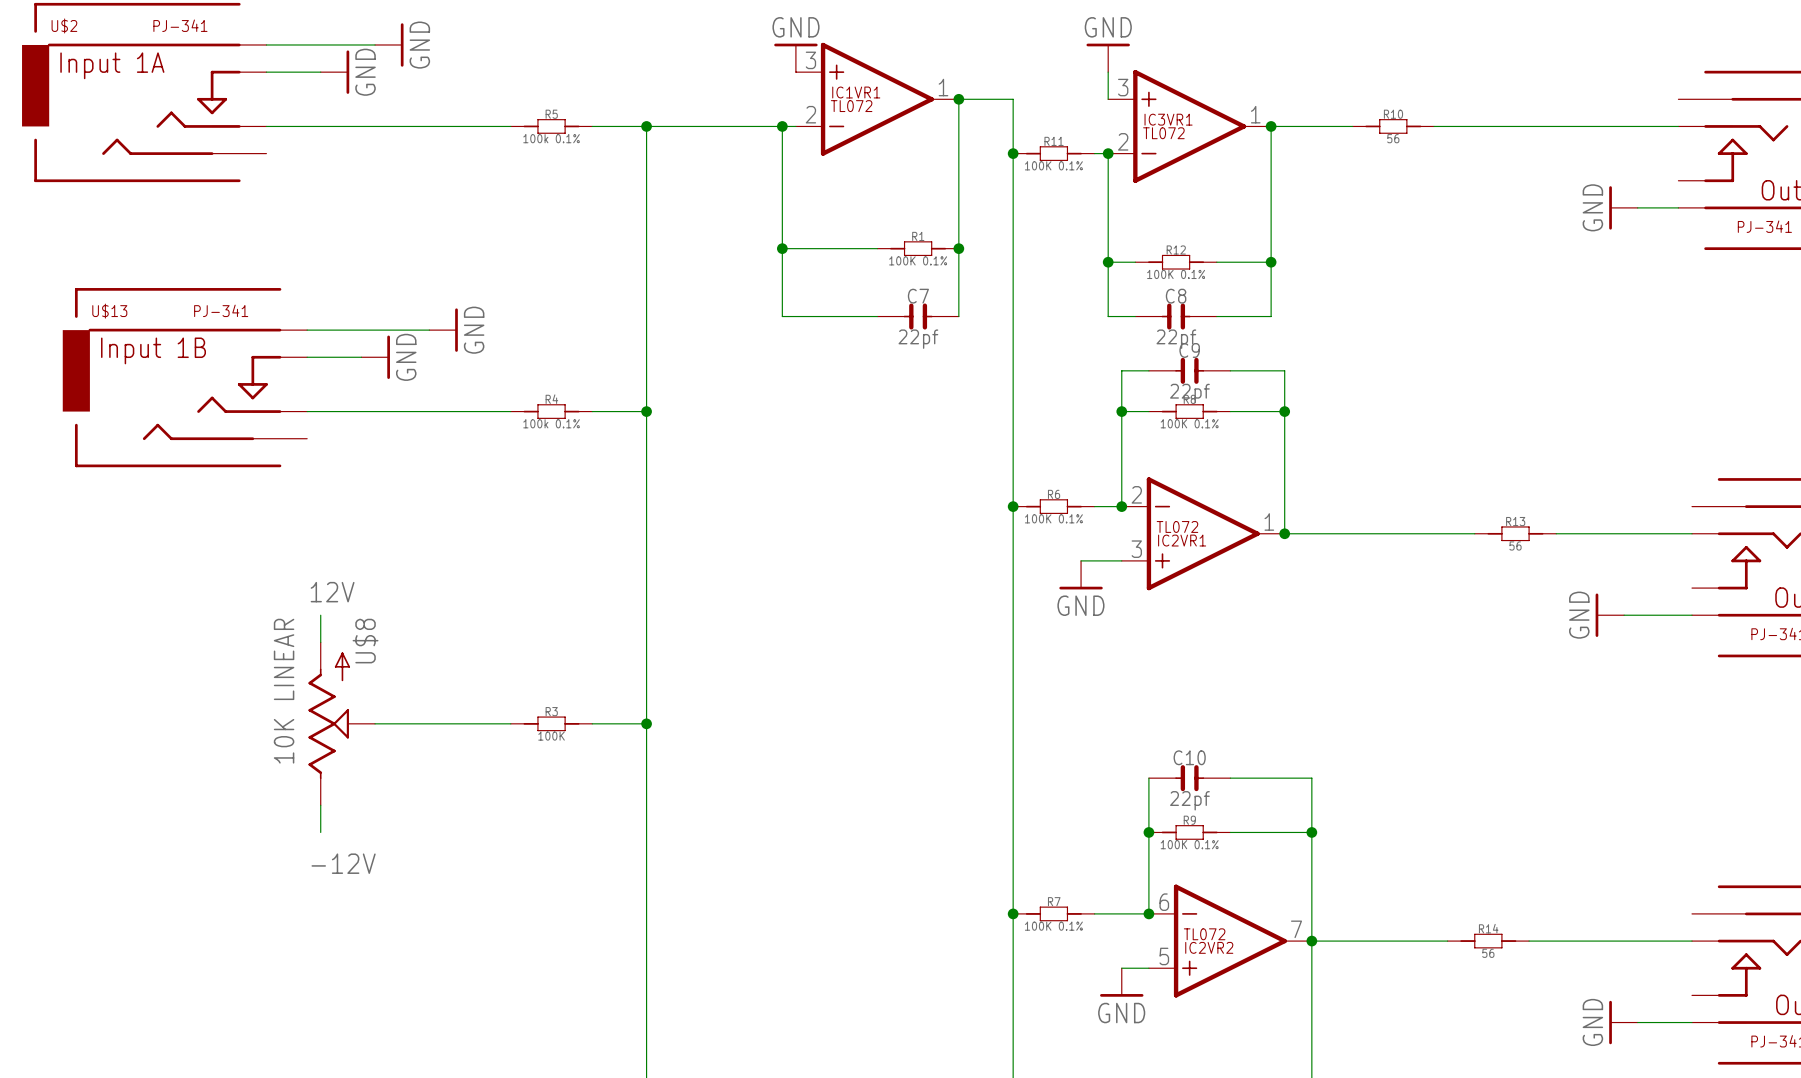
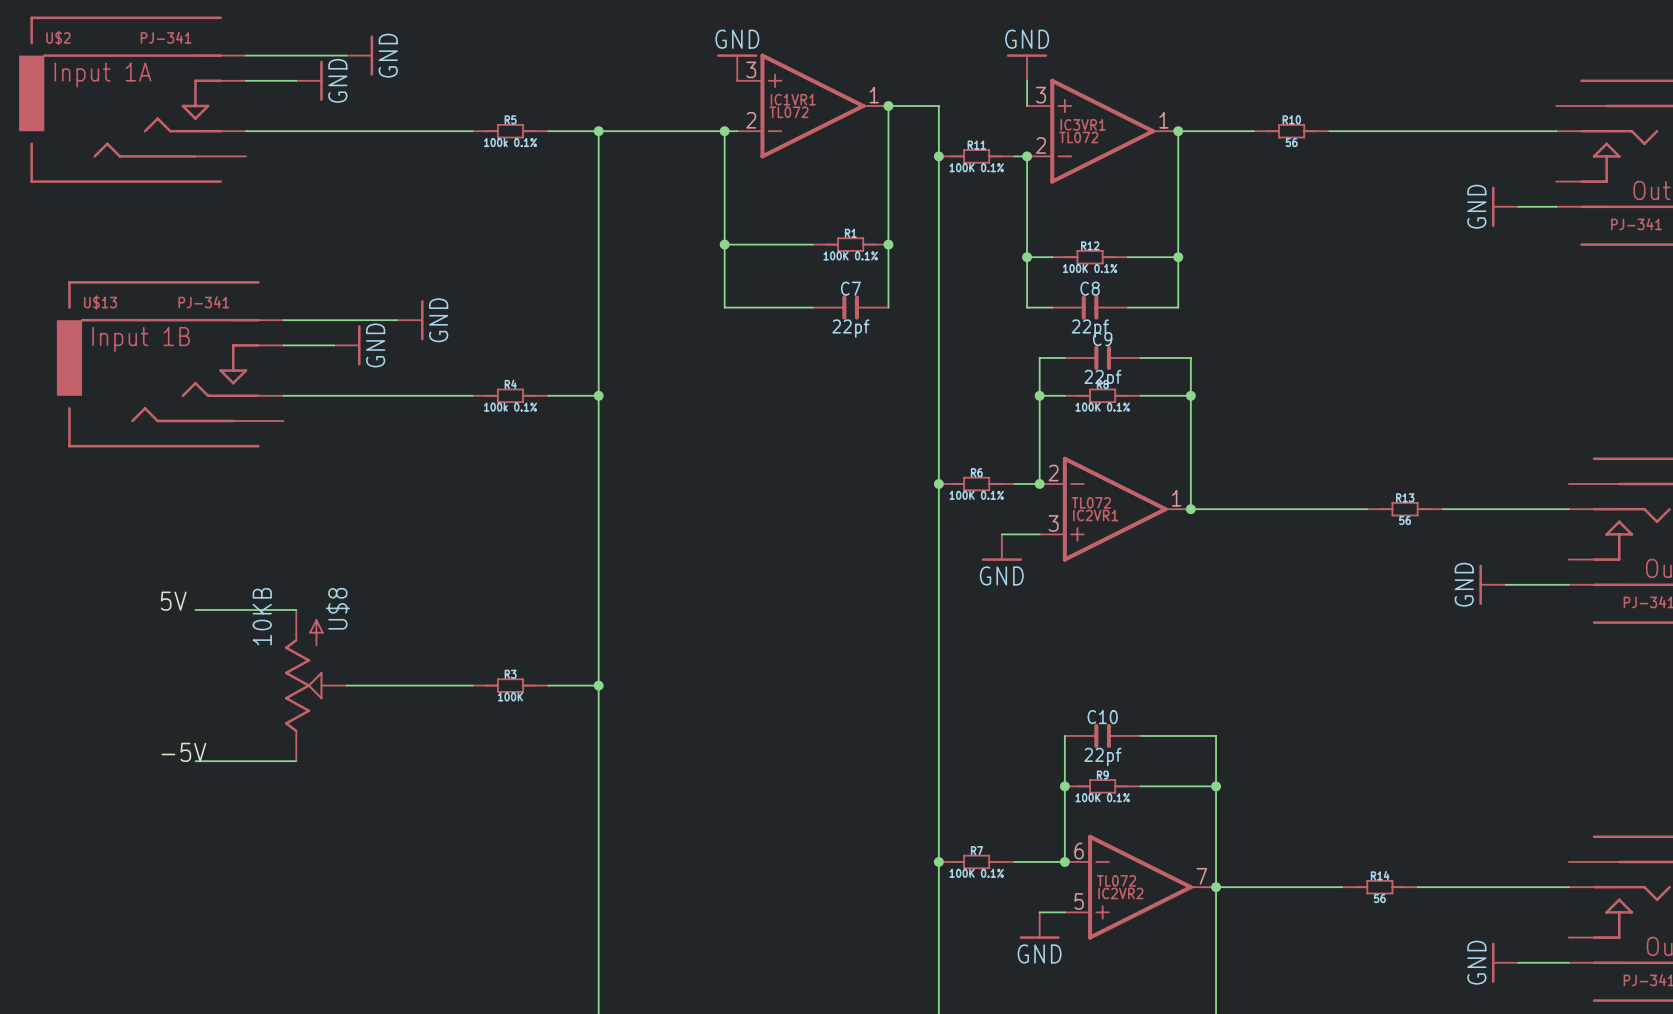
label: 12V (332, 592) -> none
wire: (320, 615) (320, 642) -> (195, 609) (296, 609)
label: none -> 5V (173, 601)
U$8 value: 10K LINEAR (284, 691) -> 10KB (262, 616)
label: none -> -5V (183, 752)
wire: (320, 805) (320, 832) -> (296, 761) (195, 761)
label: -12V (343, 863) -> none

